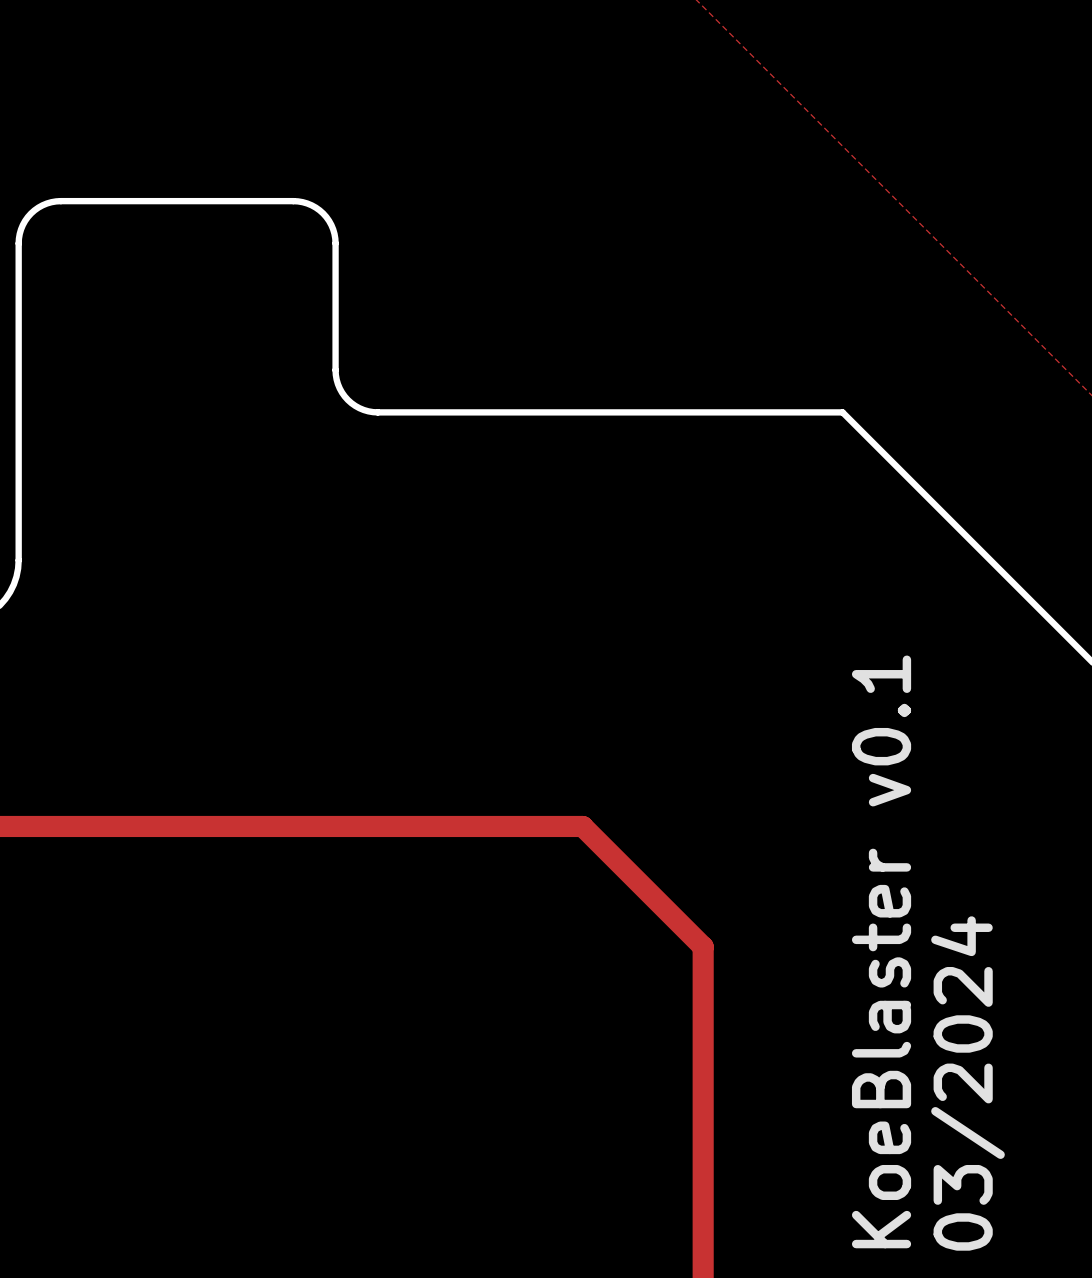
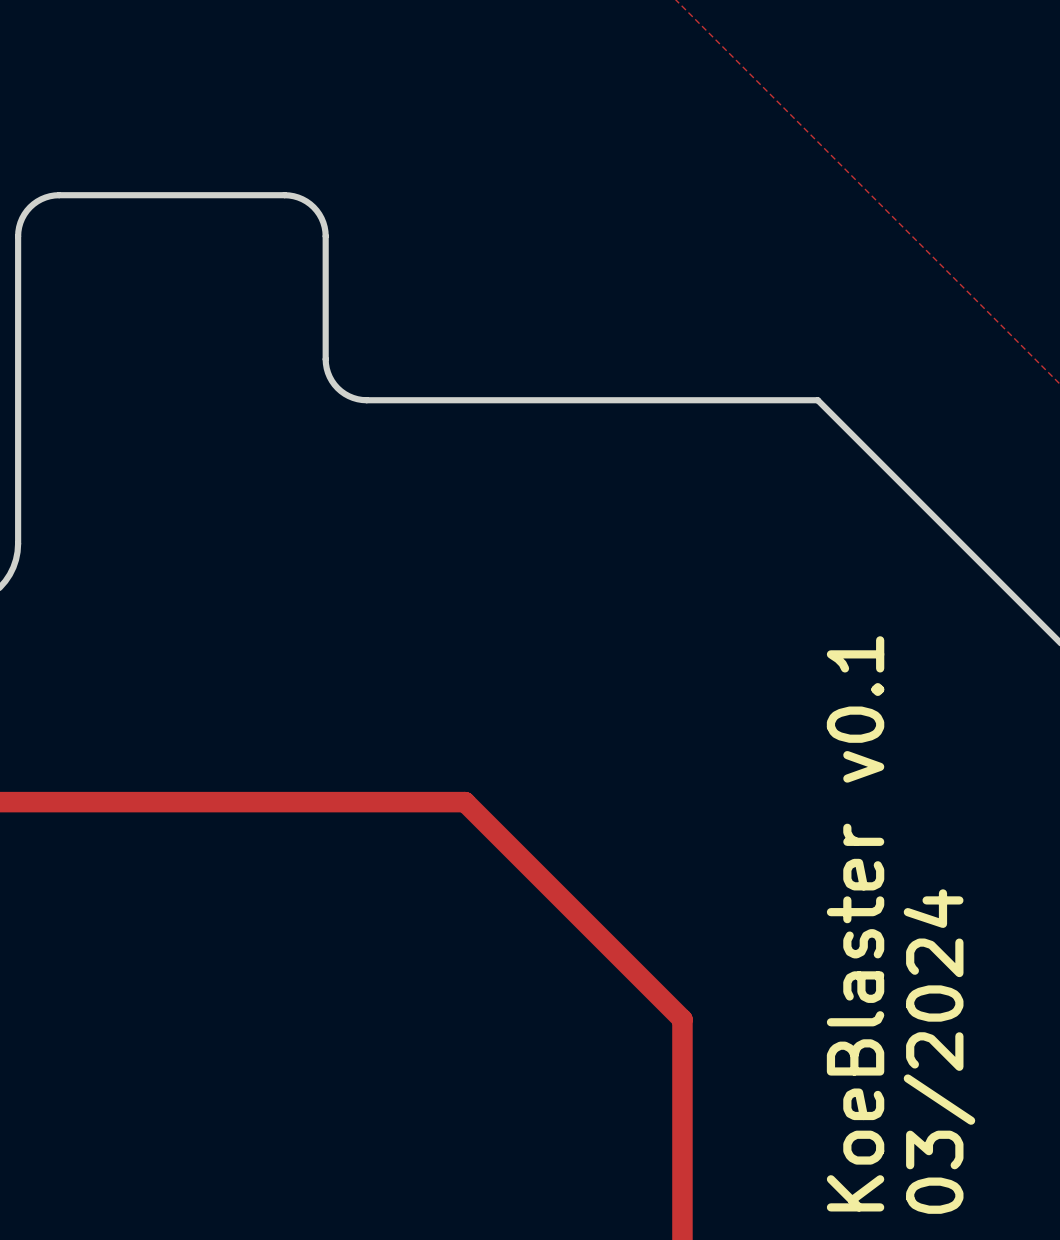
track: (479, 826) (582, 826) (703, 946) (703, 1050) -> (465, 802) (682, 1019)

